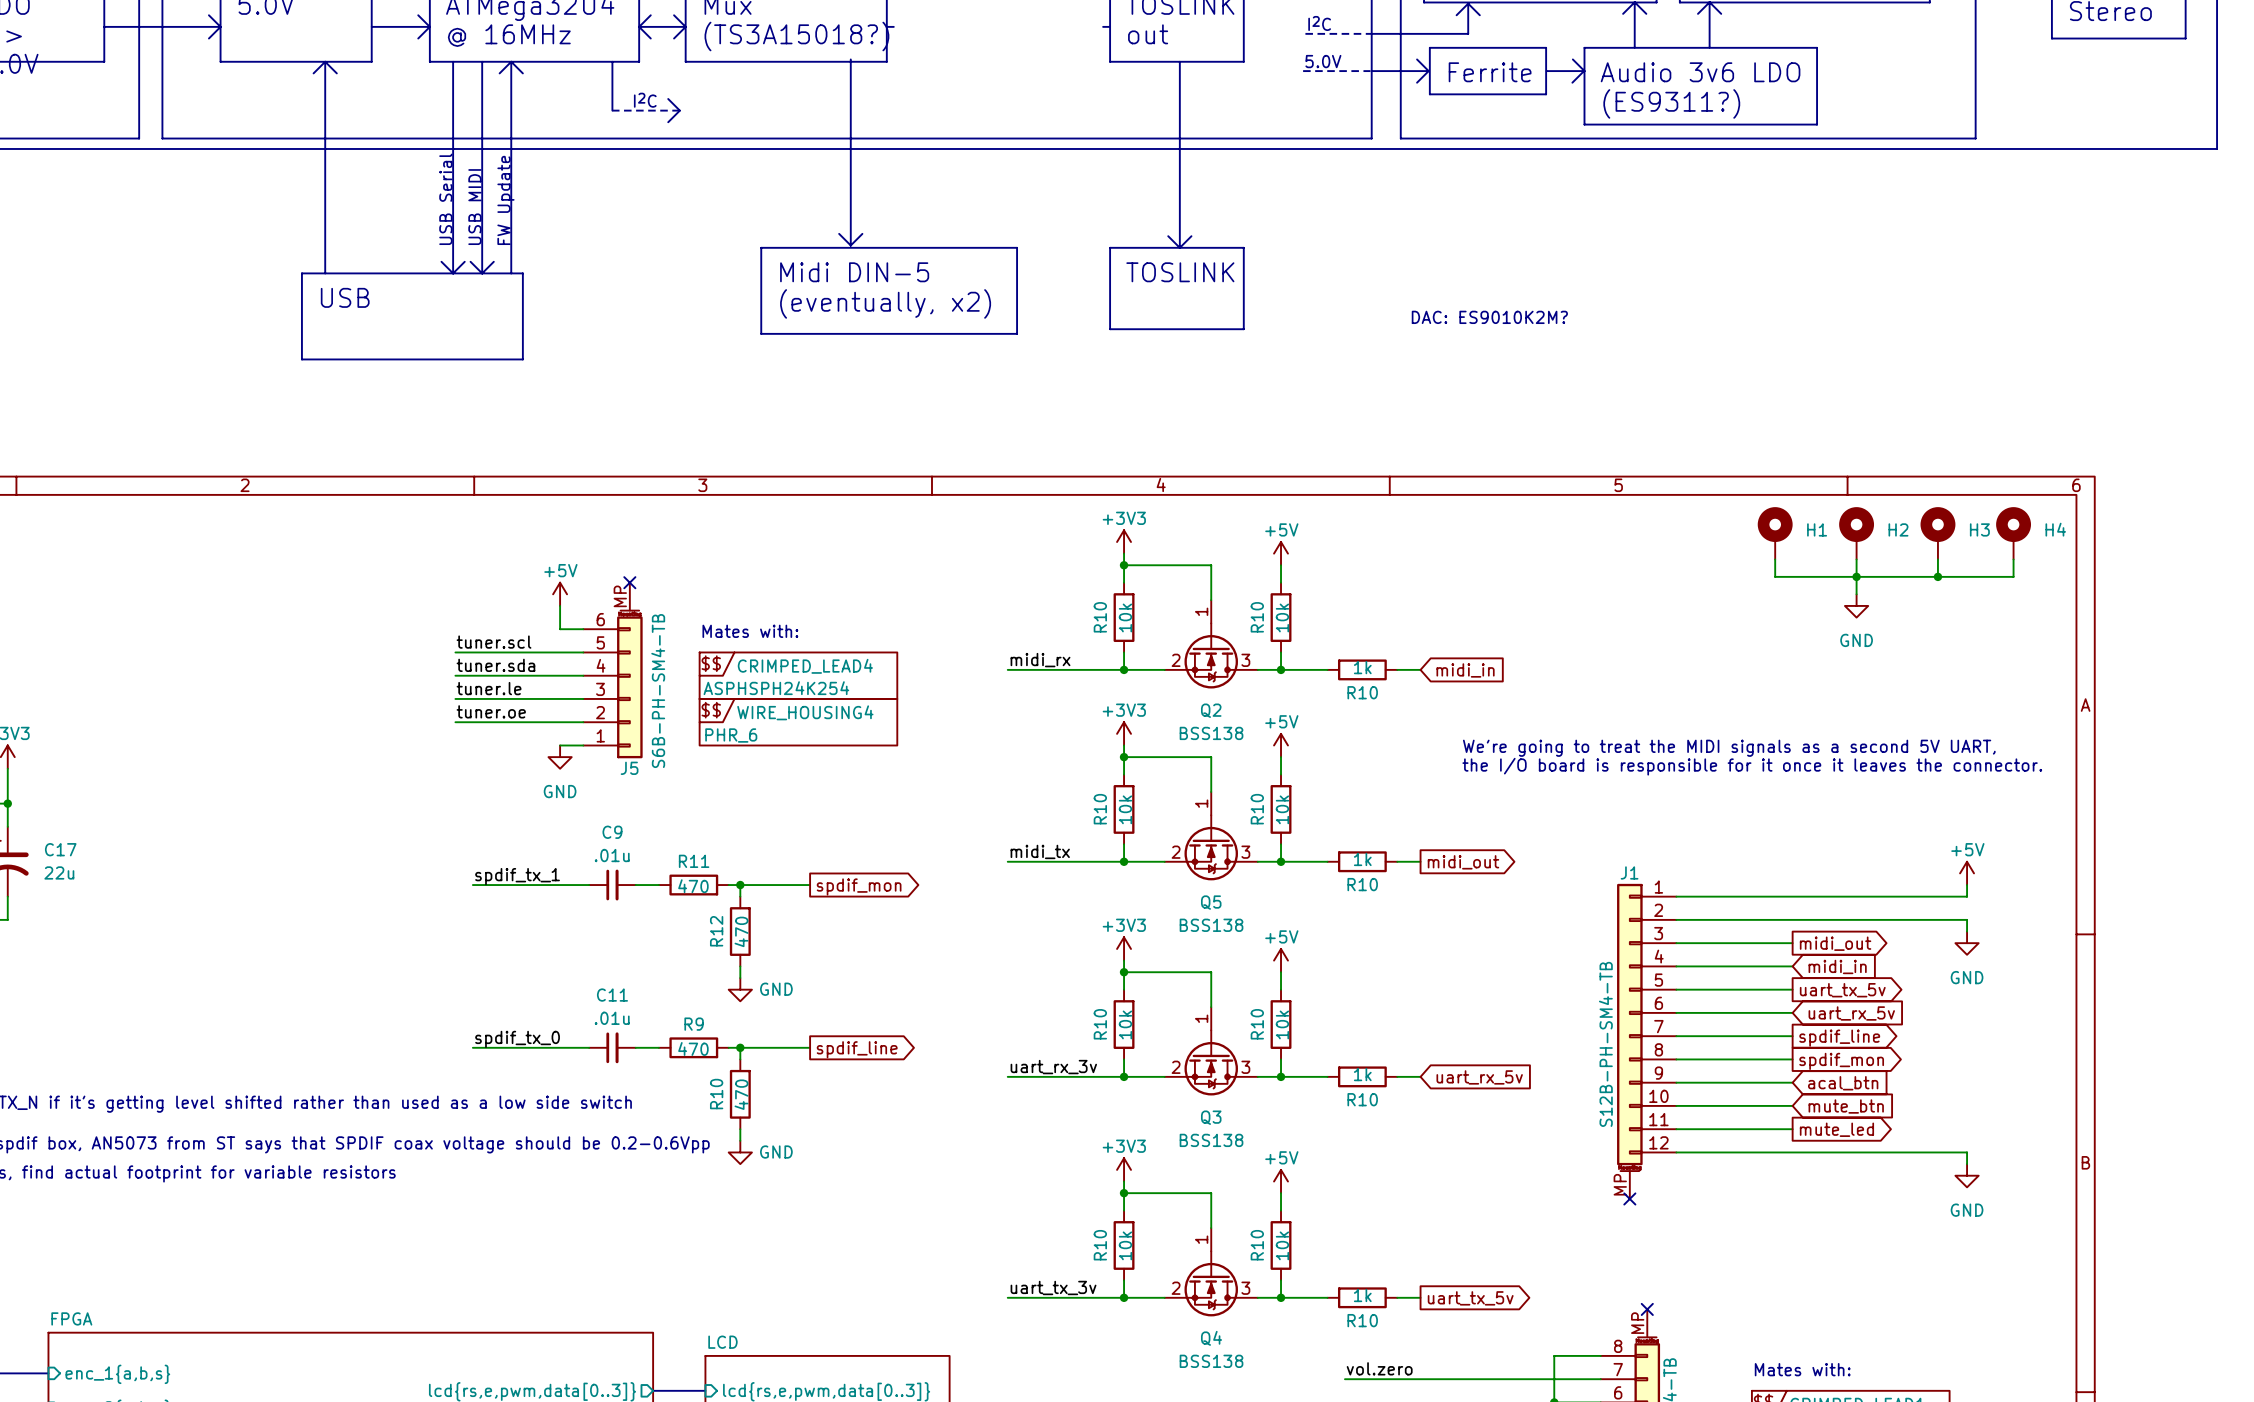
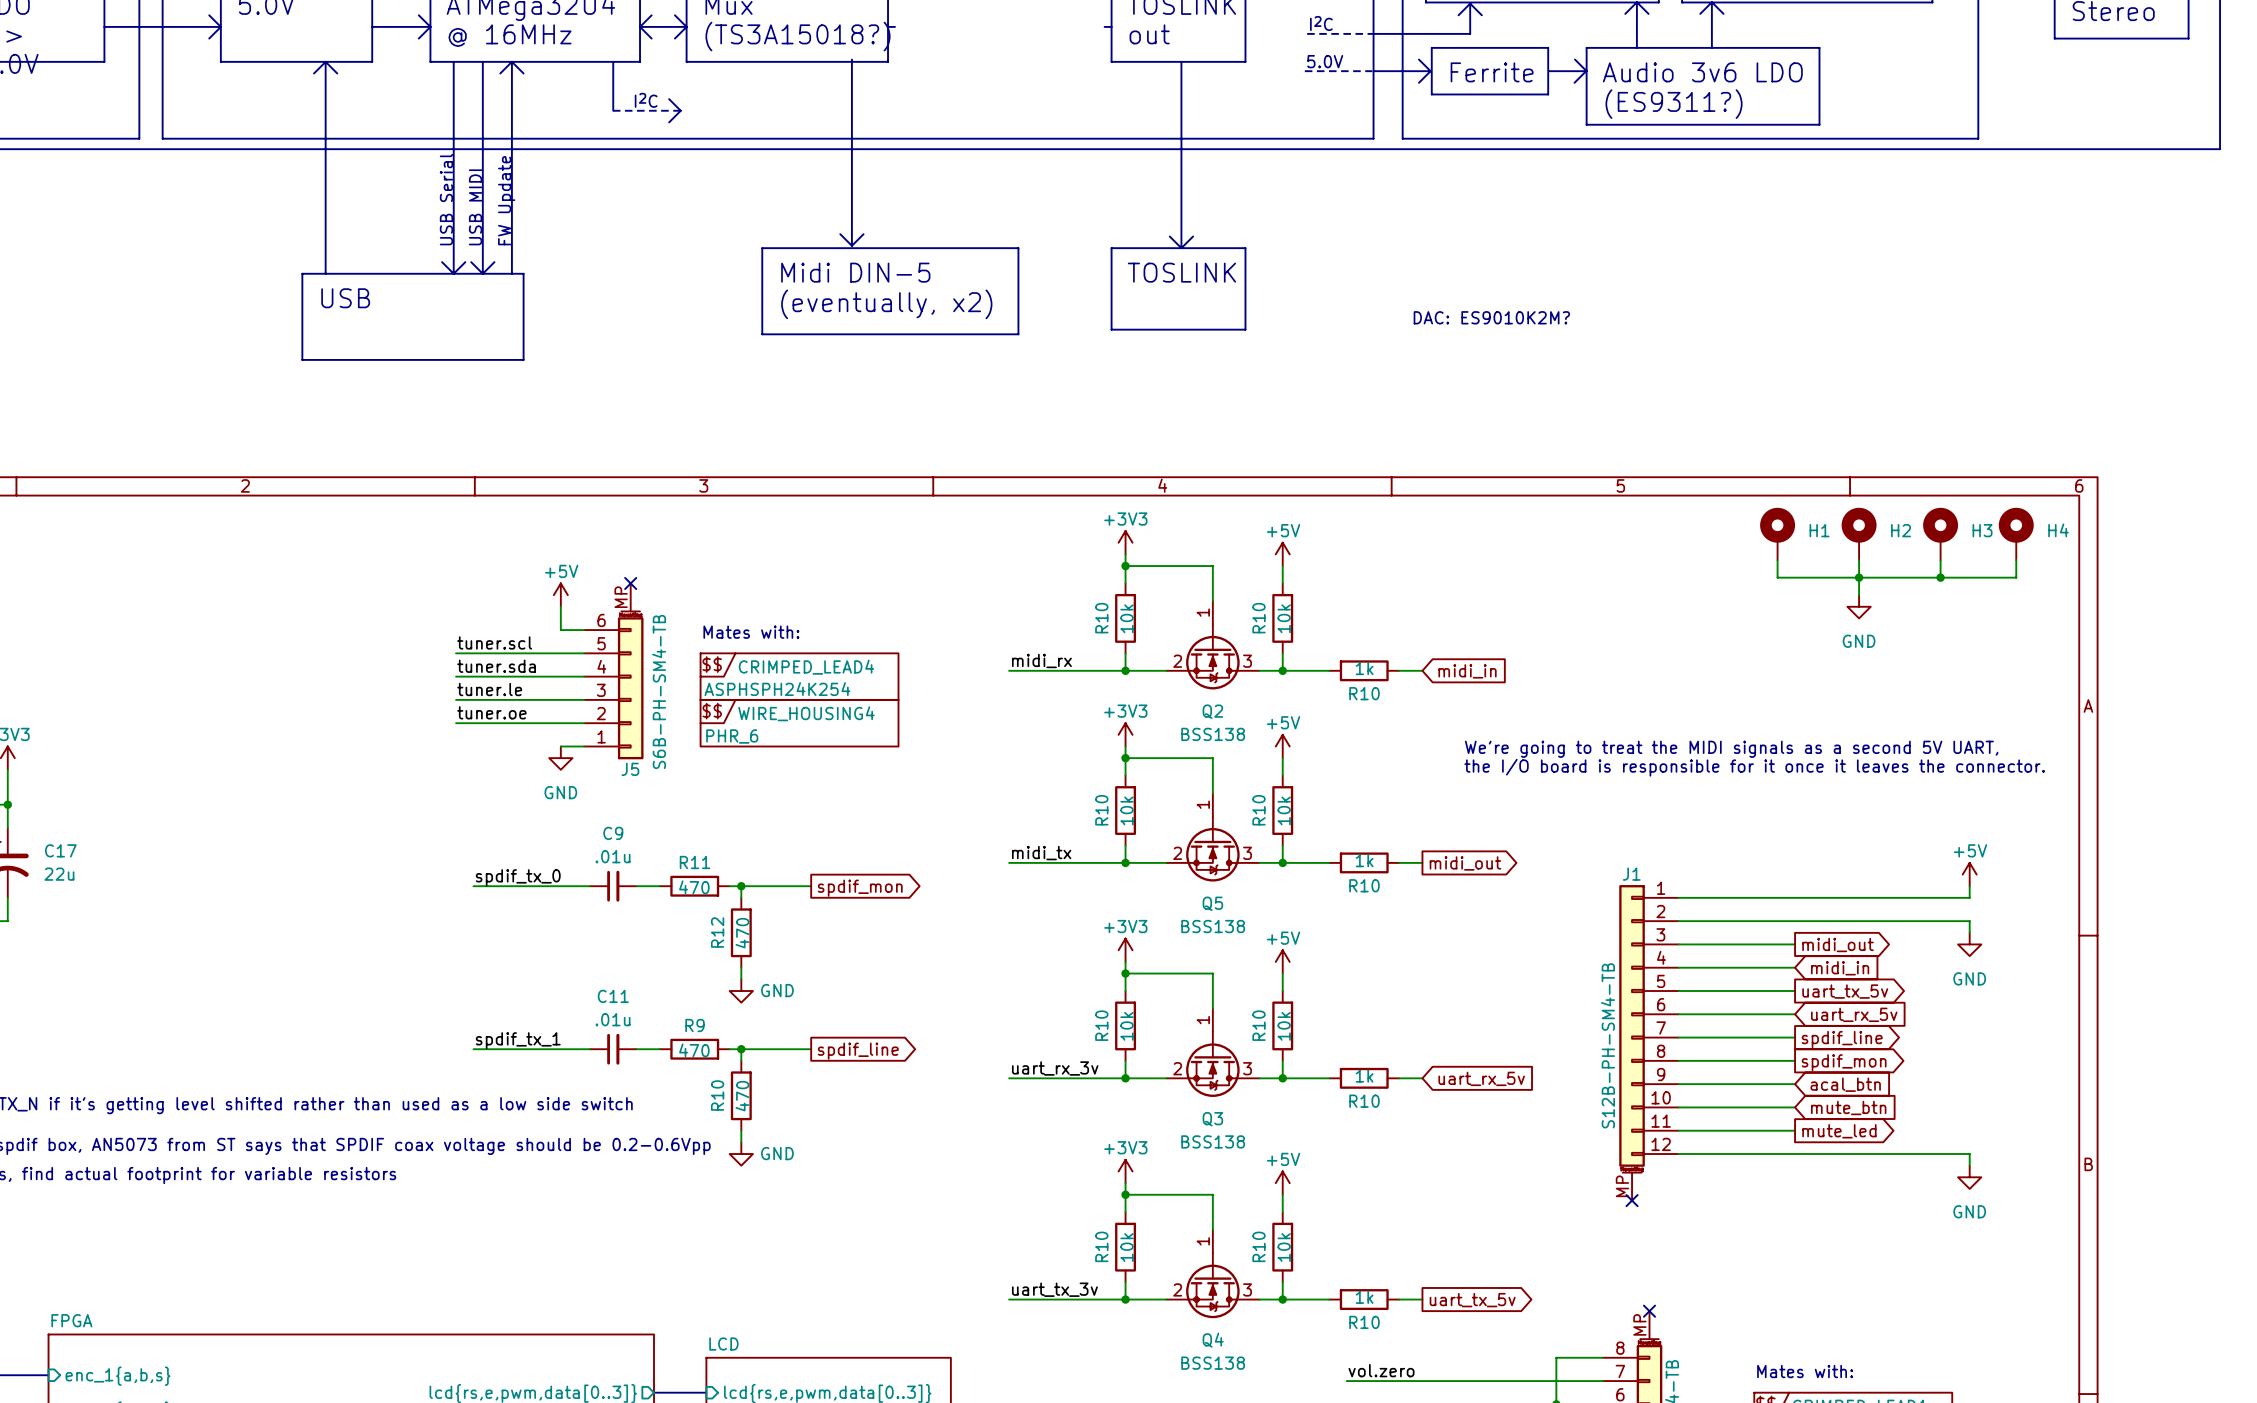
label: spdif_tx_1 (517, 876) -> spdif_tx_0 (518, 877)
label: spdif_tx_0 (517, 1039) -> spdif_tx_1 (518, 1040)

